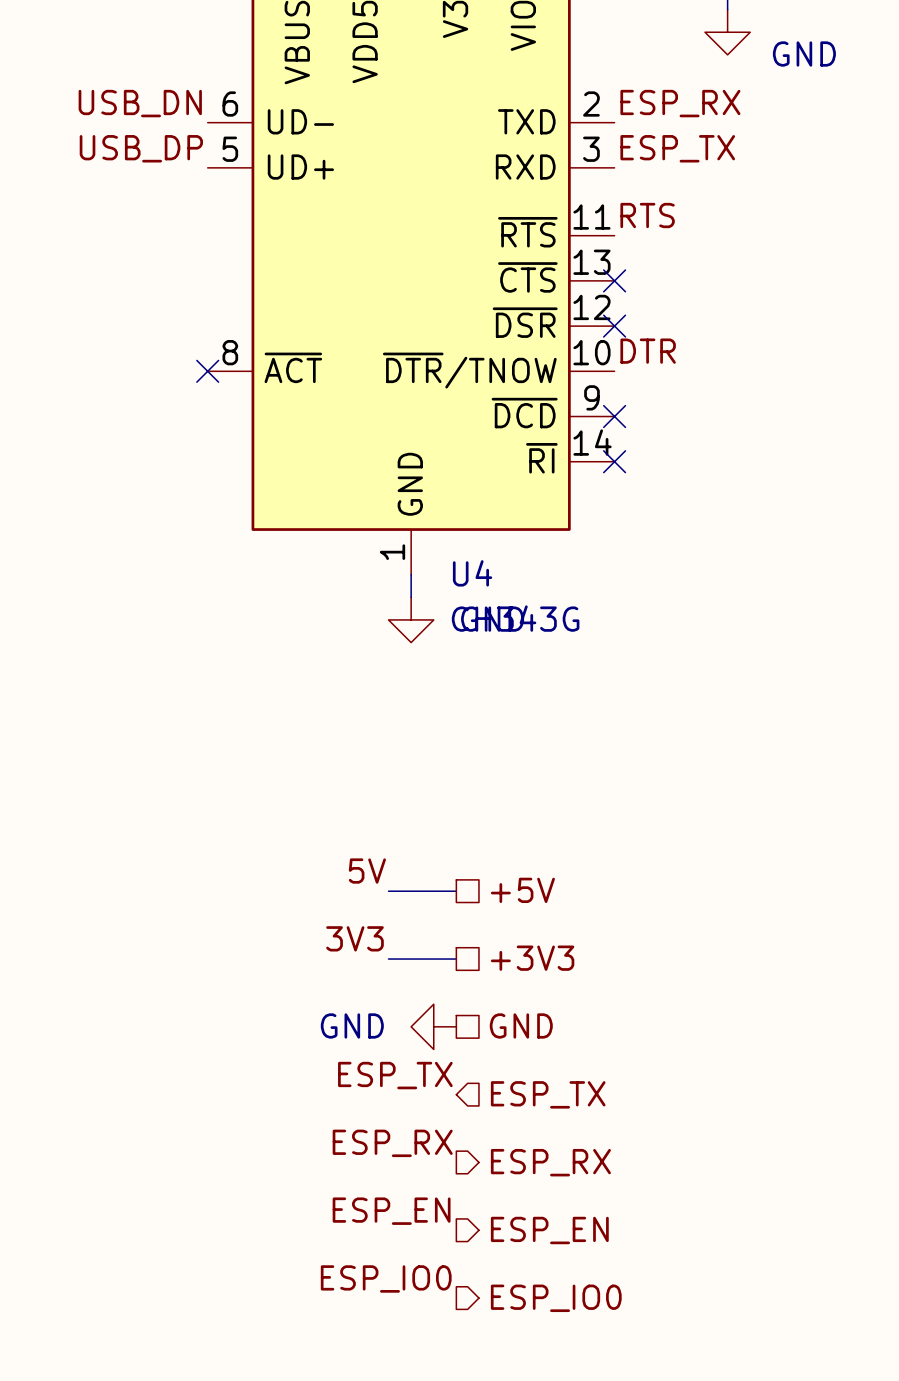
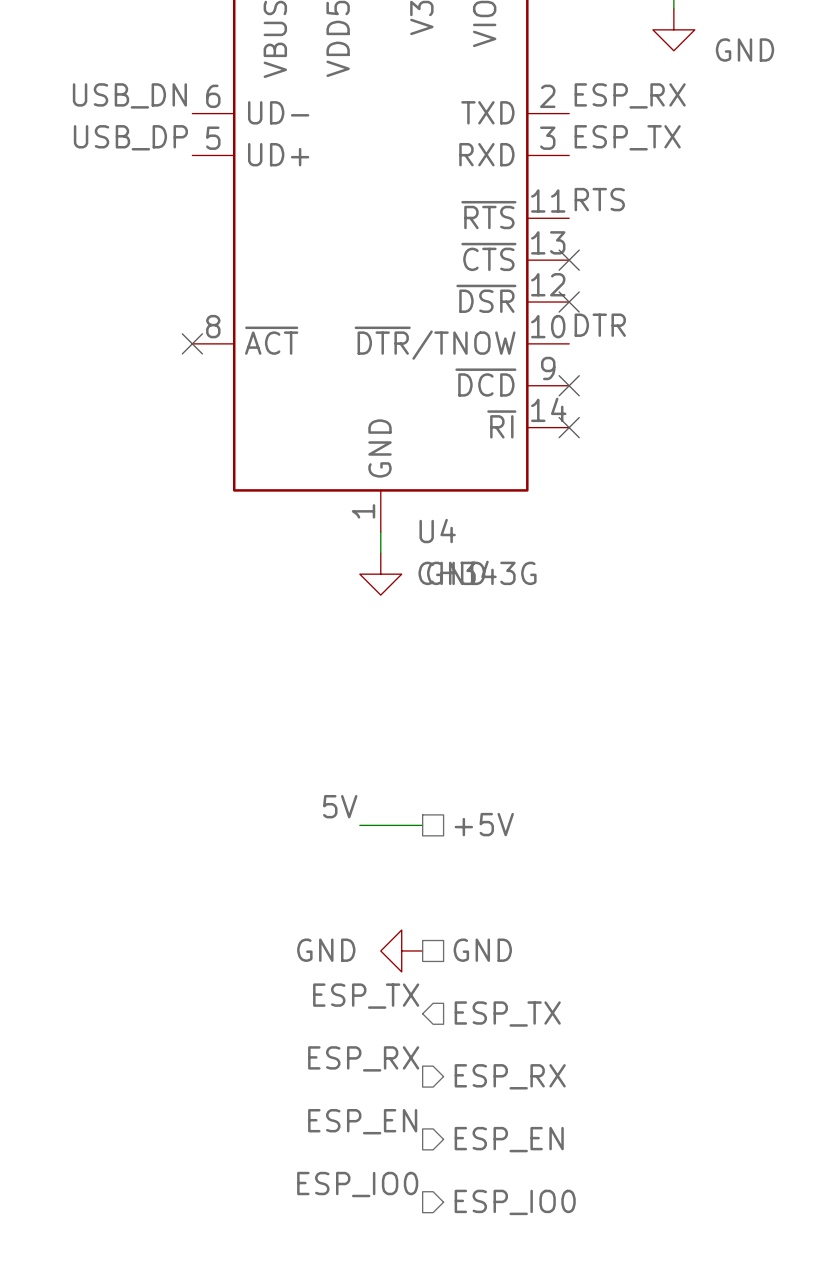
label: 3V3 (355, 938) -> none
hierarchical label: +3V3 (532, 958) -> none
wire: (388, 959) (456, 959) -> none

